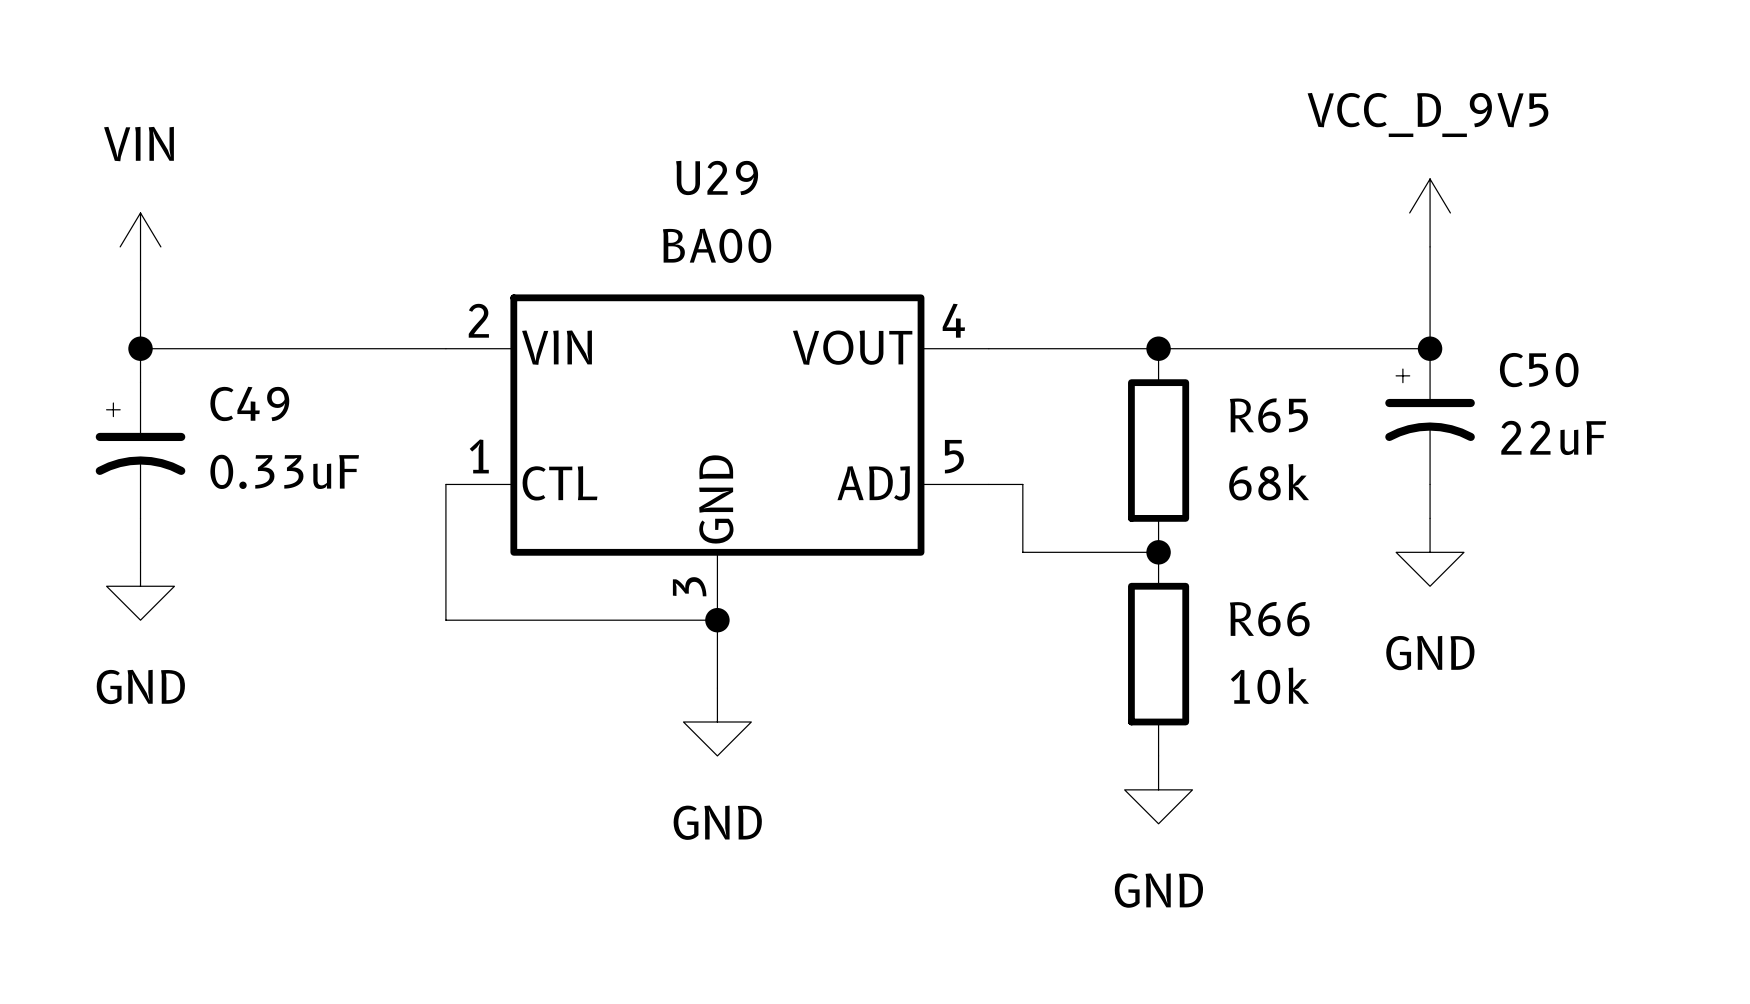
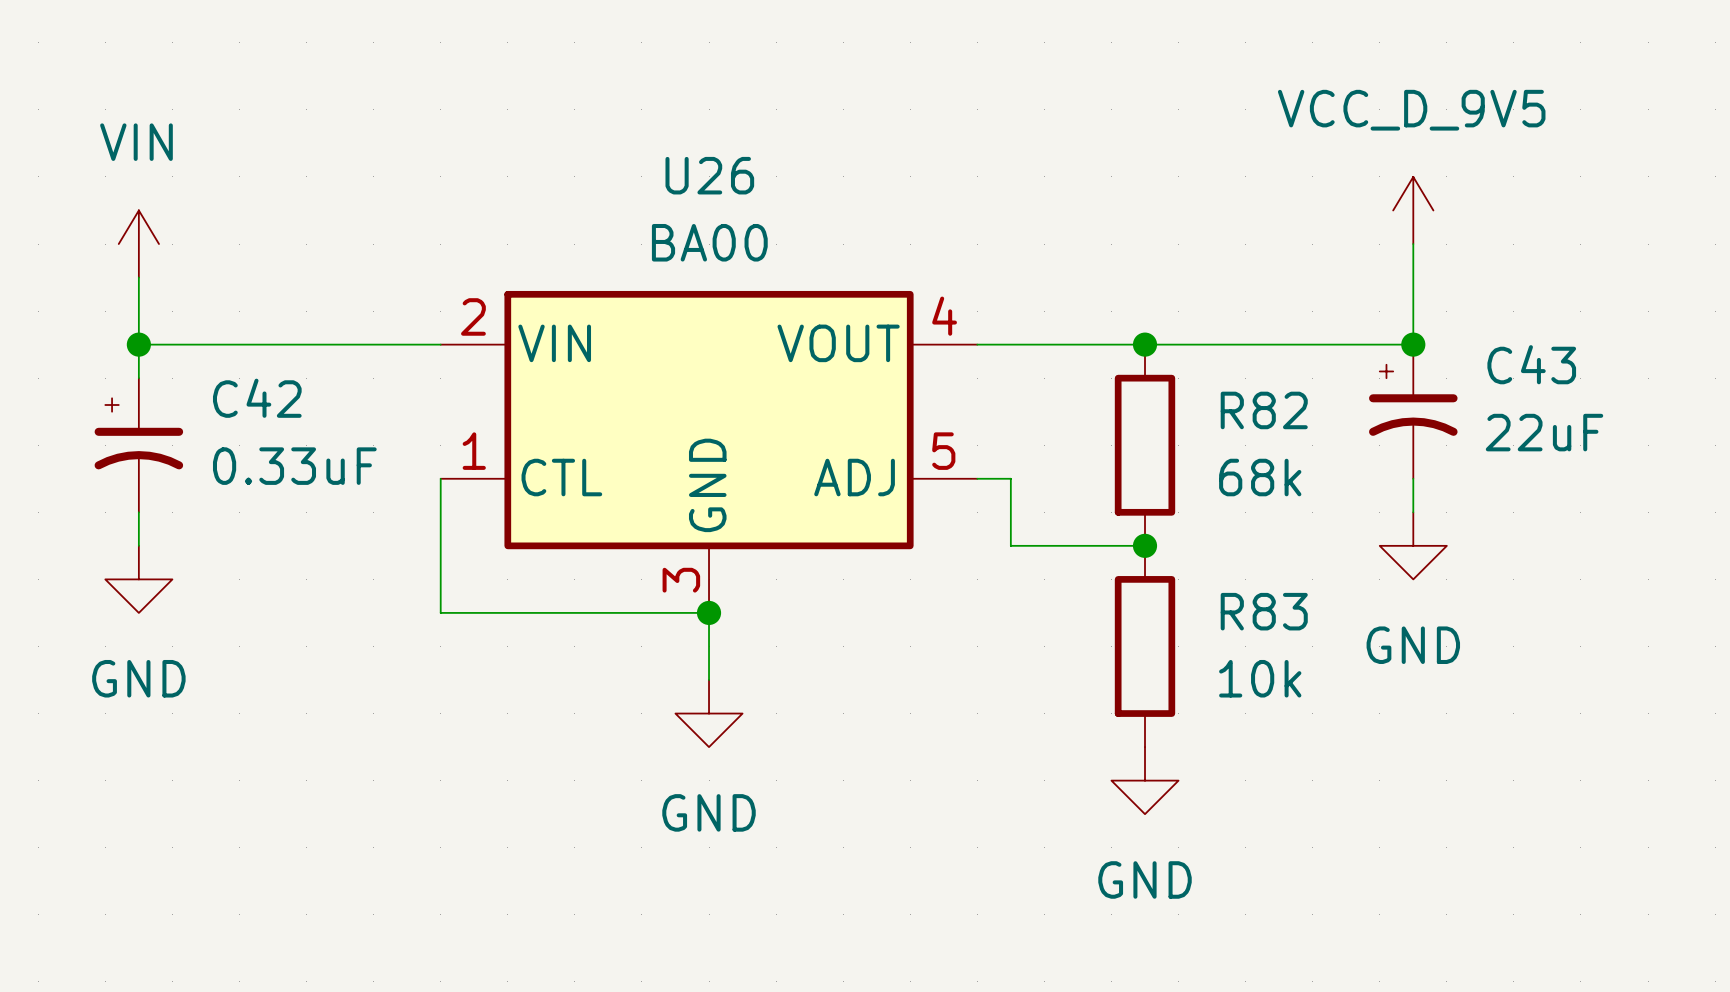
U29 name: U29 (717, 177) -> U26 (709, 175)
C50 name: C50 (1539, 370) -> C43 (1531, 364)
C49 name: C49 (249, 403) -> C42 (257, 398)
R65 name: R65 (1268, 415) -> R82 (1264, 410)
R66 name: R66 (1269, 619) -> R83 (1264, 611)

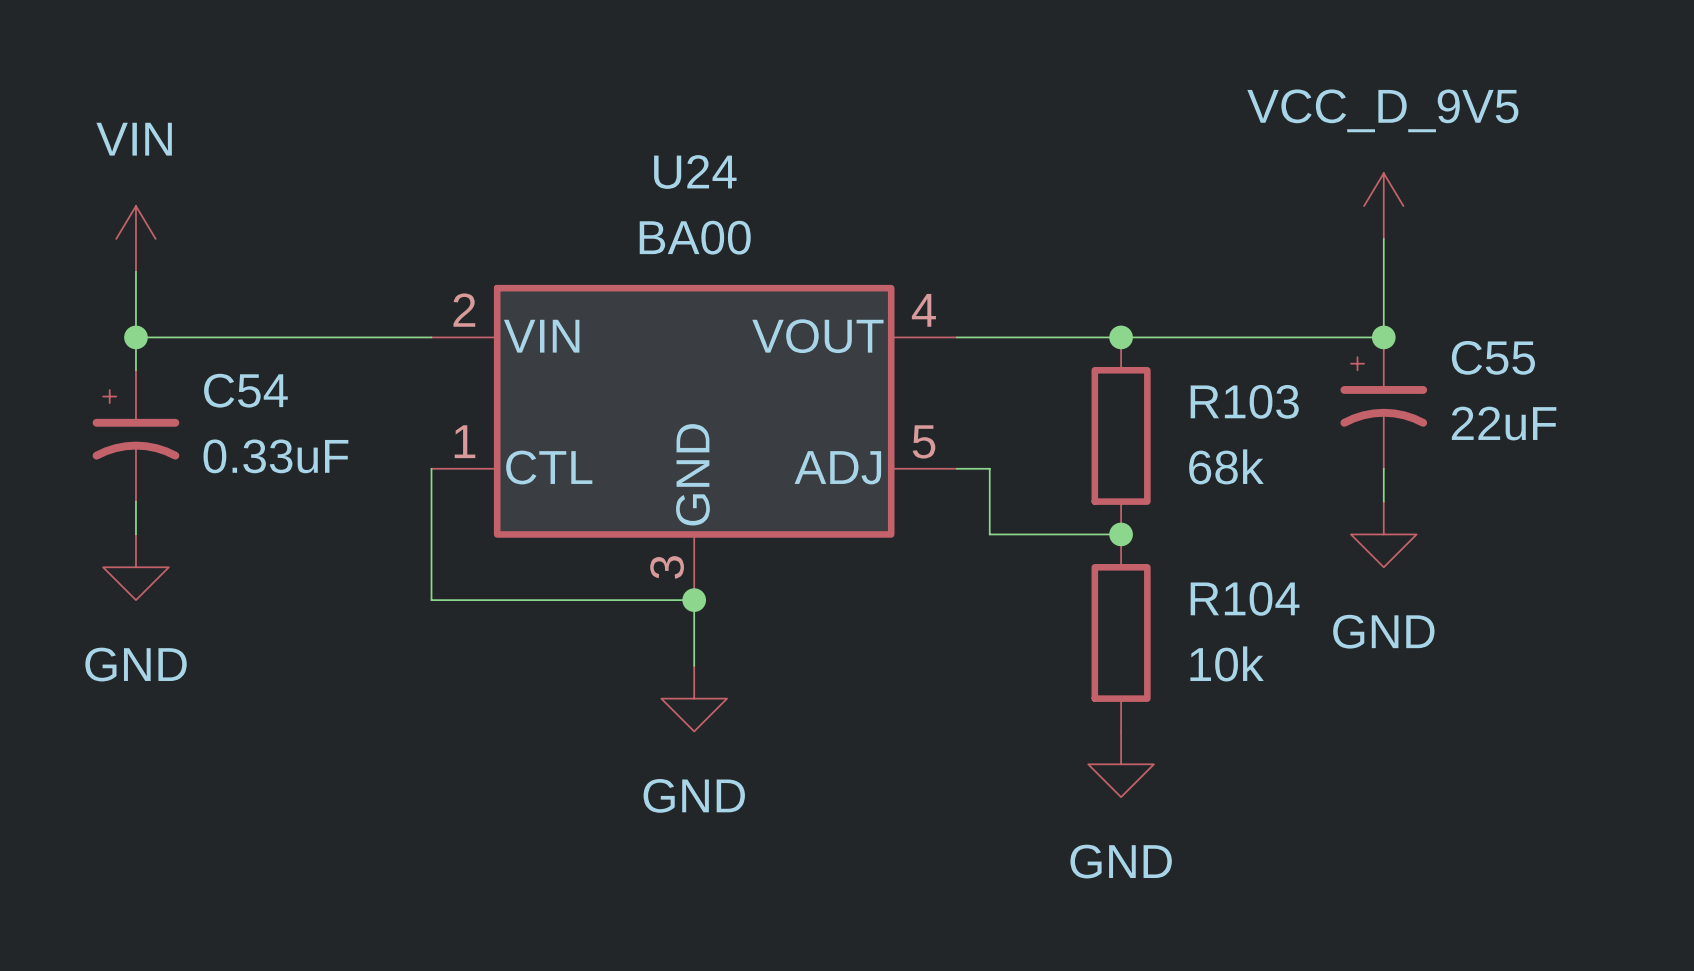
U26 name: U26 (709, 175) -> U24 (695, 172)
C43 name: C43 (1531, 364) -> C55 (1493, 357)
C42 name: C42 (257, 398) -> C54 (245, 390)
R82 name: R82 (1264, 410) -> R103 (1244, 401)
R83 name: R83 (1264, 611) -> R104 (1245, 598)

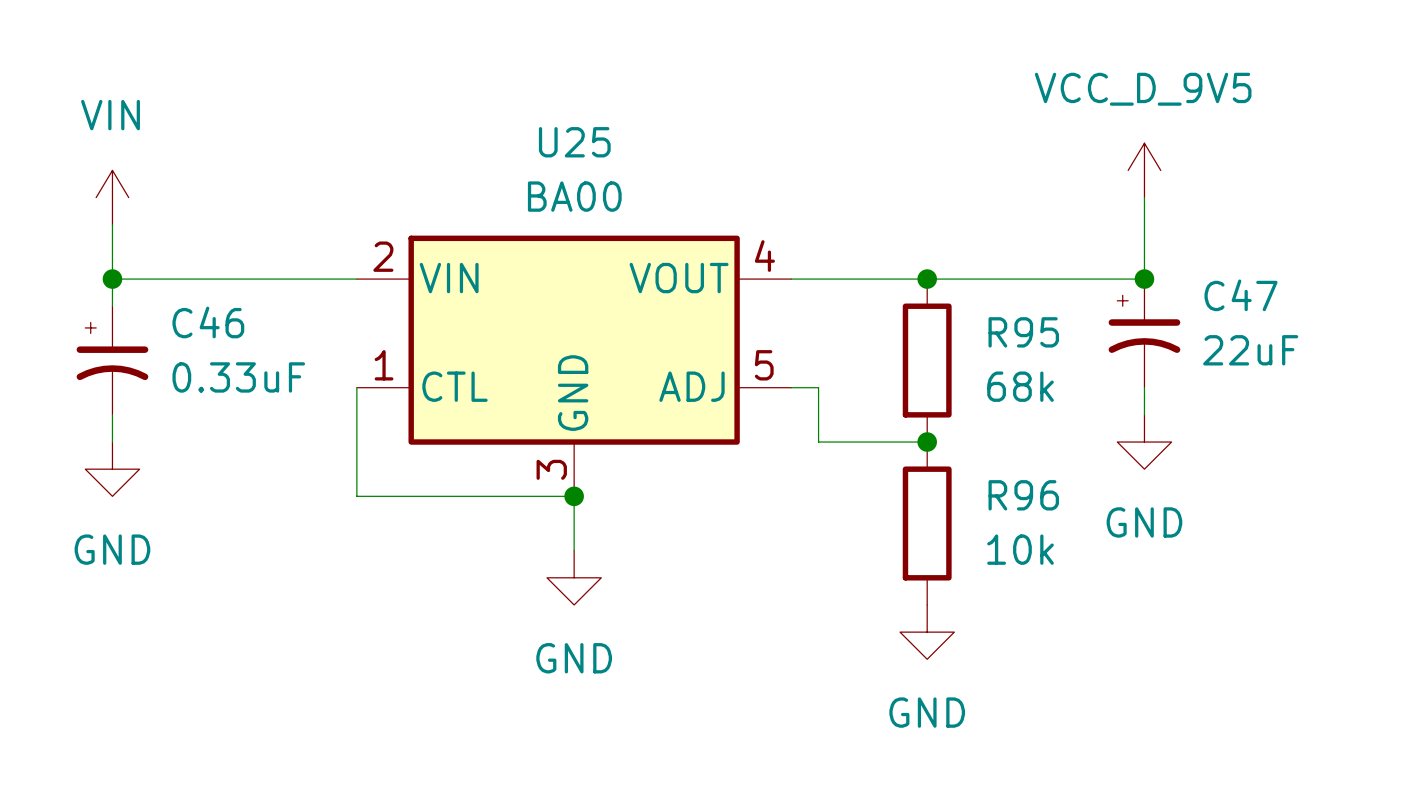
U24 name: U24 (695, 172) -> U25 (574, 142)
C55 name: C55 (1493, 357) -> C47 (1241, 295)
C54 name: C54 (245, 390) -> C46 (208, 322)
R103 name: R103 (1244, 401) -> R95 (1023, 332)
R104 name: R104 (1245, 598) -> R96 (1023, 495)

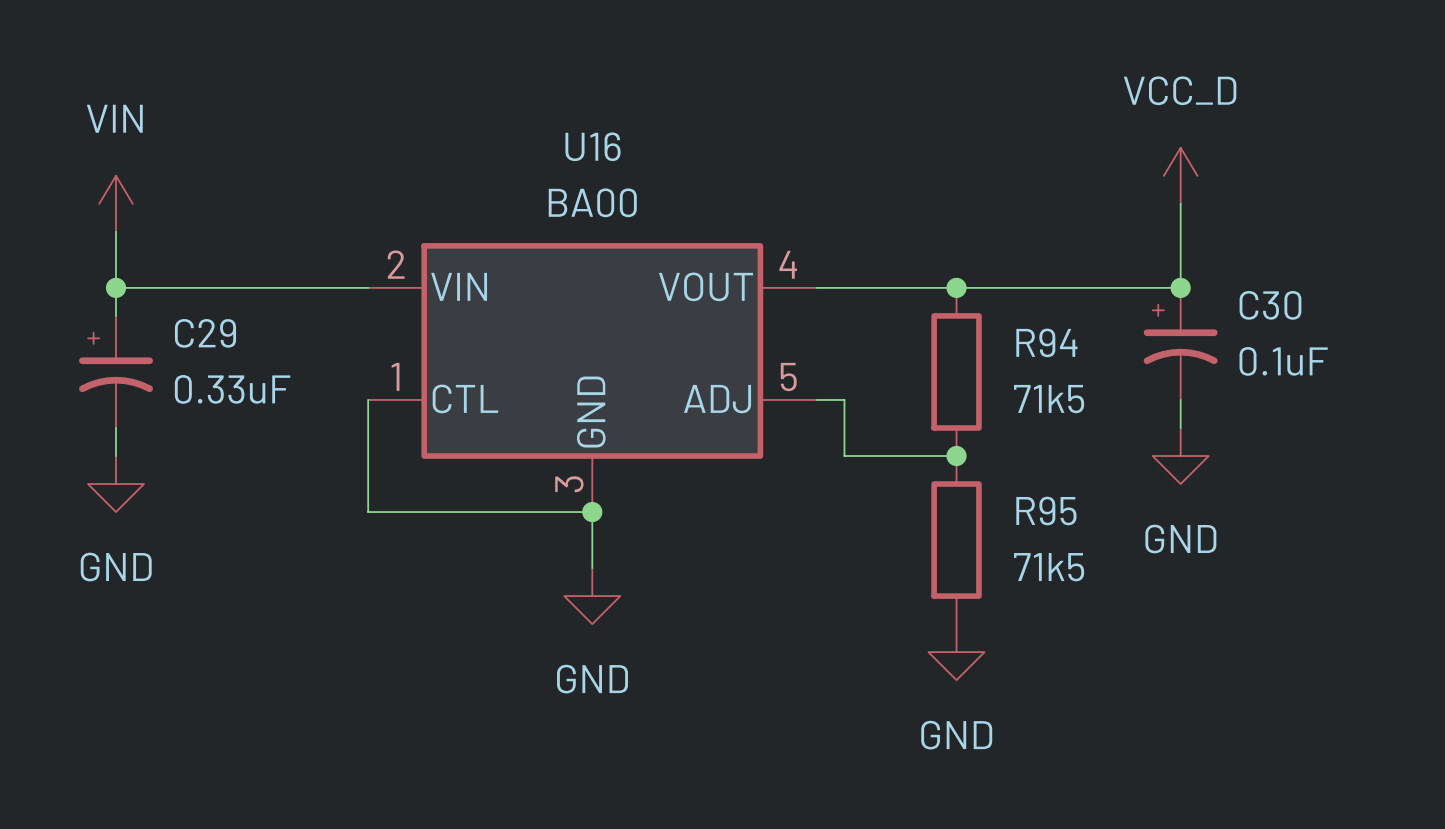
U25 name: U25 (574, 142) -> U16 (593, 146)
power symbol: VCC_D_9V5 (1144, 170) -> VCC_D (1180, 175)
C47 name: C47 (1241, 295) -> C30 (1270, 305)
C46 name: C46 (208, 322) -> C29 (205, 333)
R95 name: R95 (1023, 332) -> R94 (1046, 342)
C47 value: 22uF (1250, 350) -> 0.1uF (1283, 361)
R95 value: 68k (1020, 386) -> 71k5 (1049, 399)
R96 name: R96 (1023, 495) -> R95 (1046, 511)
R96 value: 10k (1020, 549) -> 71k5 (1049, 567)

